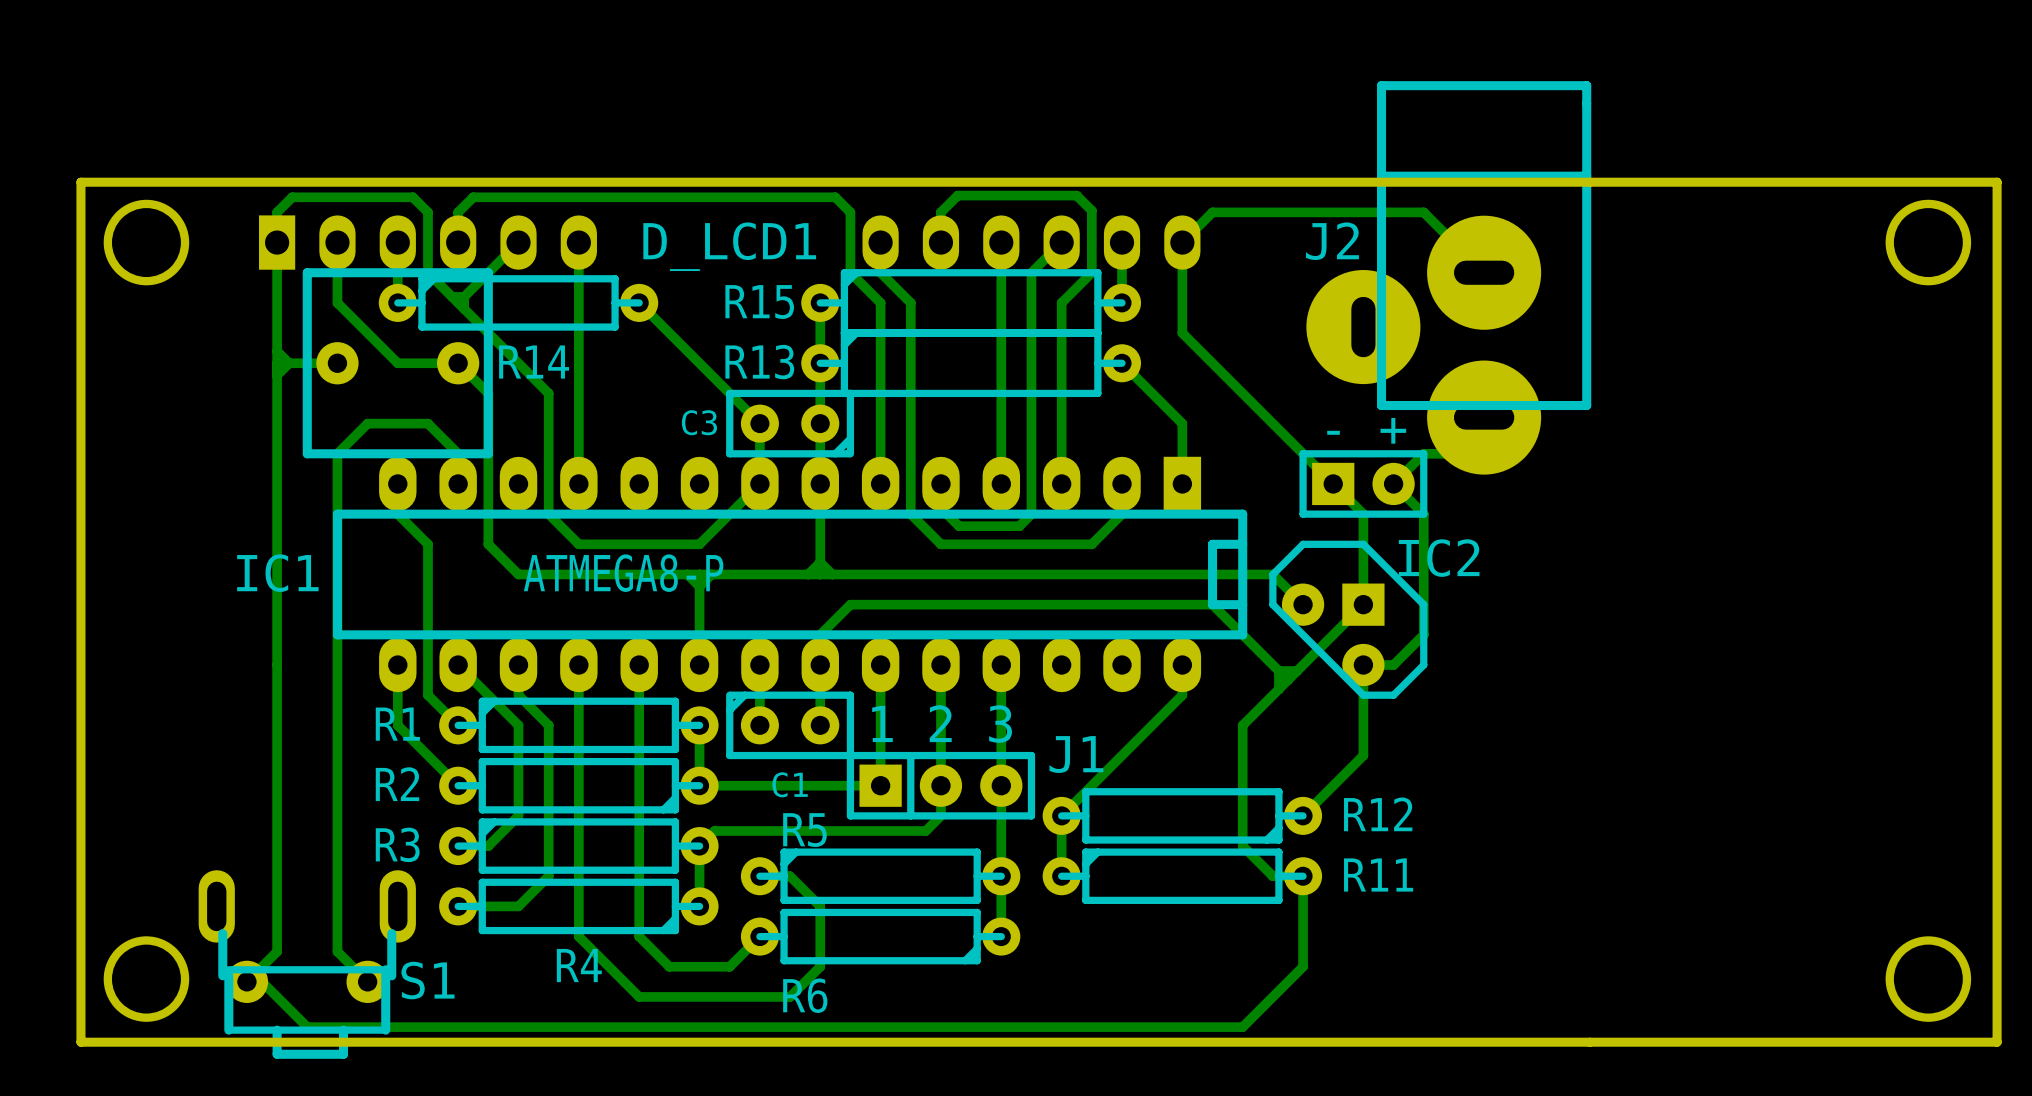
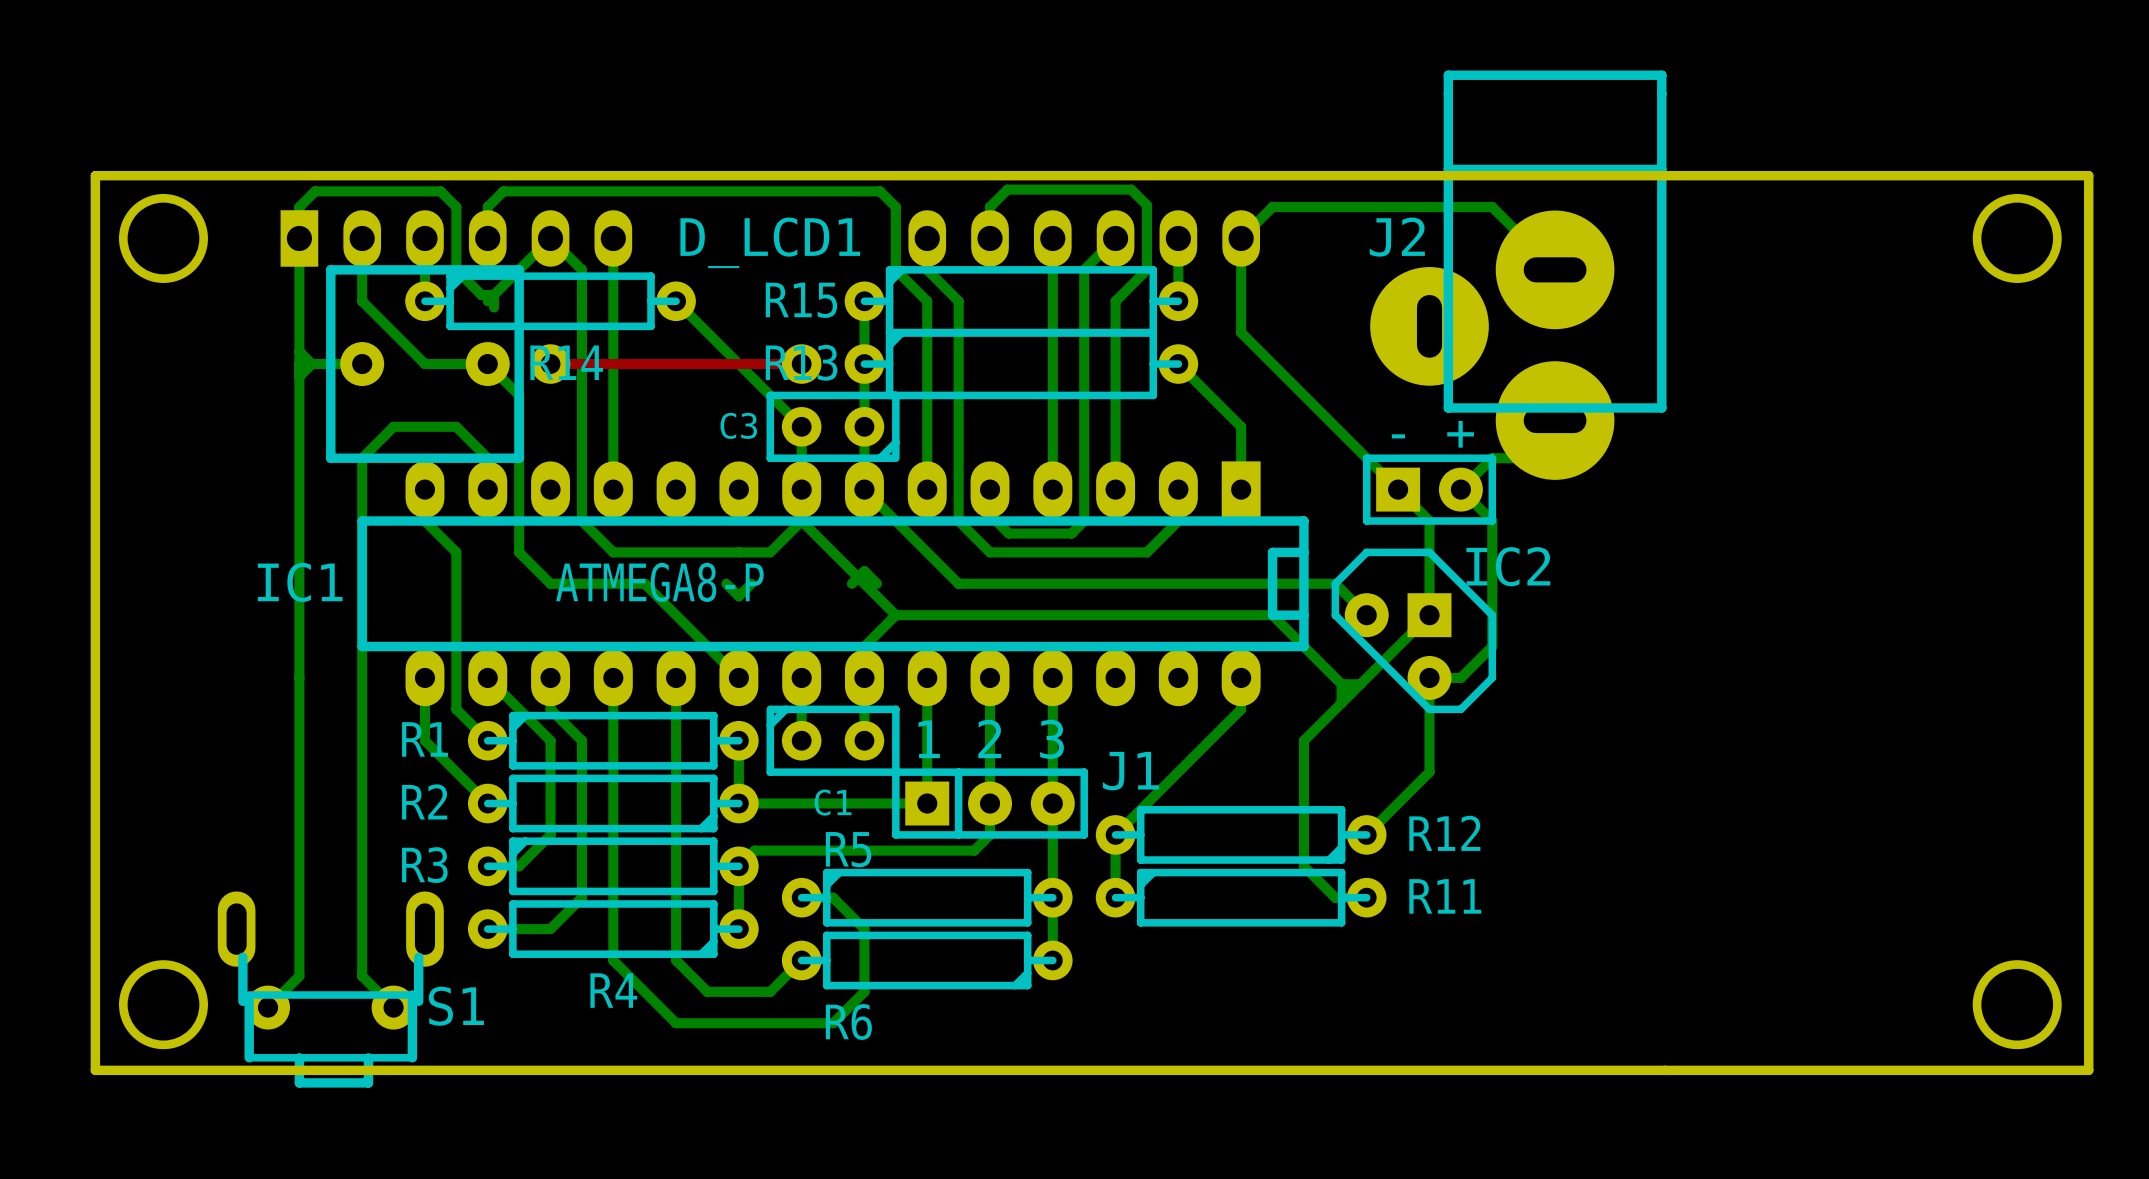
bottom track: (452, 296) (548, 393) -> (550, 238) (581, 269) (581, 395)
top track: none -> (550, 364) (801, 364)
part: none -> (550, 364)
part: none -> (801, 364)
bottom track: (759, 483) (699, 544) -> (801, 521) (770, 552) (738, 552)
bottom track: (820, 483) (820, 574) -> (864, 489) (958, 583)
bottom track: none -> (801, 521) (895, 615)
bottom track: (609, 574) (910, 574) -> none
bottom track: (699, 574) (699, 665) -> (644, 583) (738, 677)
bottom track: (1303, 876) (1303, 966) (1242, 1027) (307, 1027) (262, 981) (246, 981) -> none

